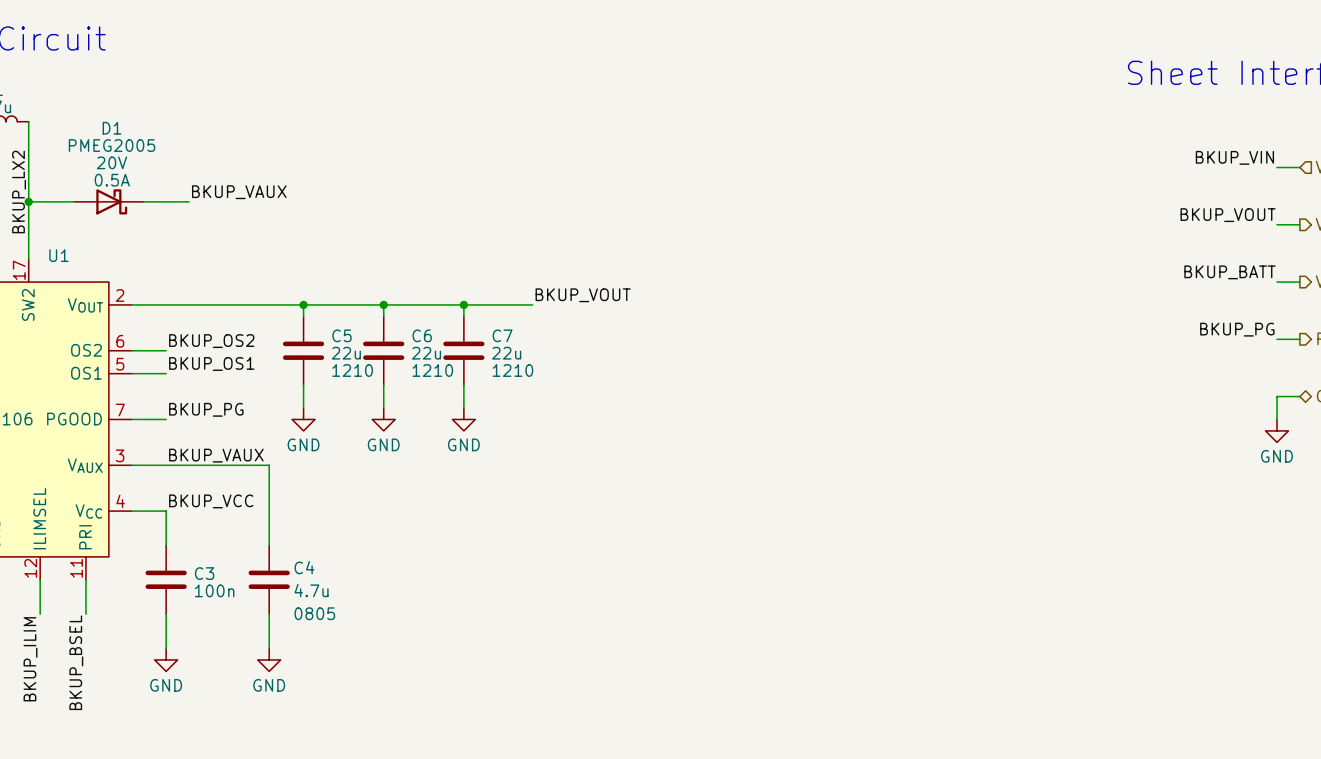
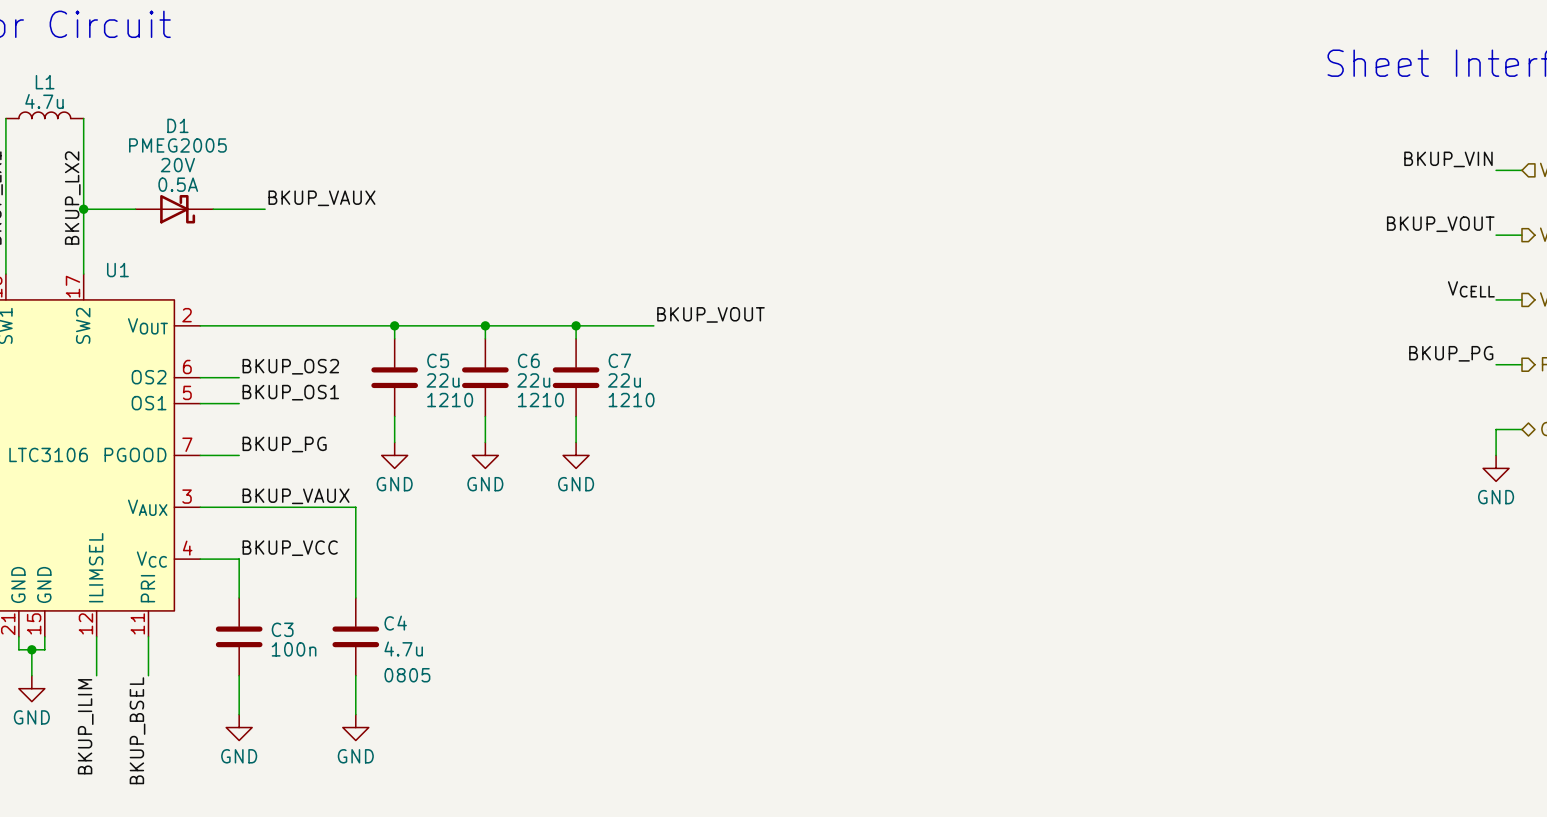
label: BKUP_BATT (1229, 272) -> VCELL (1471, 289)

